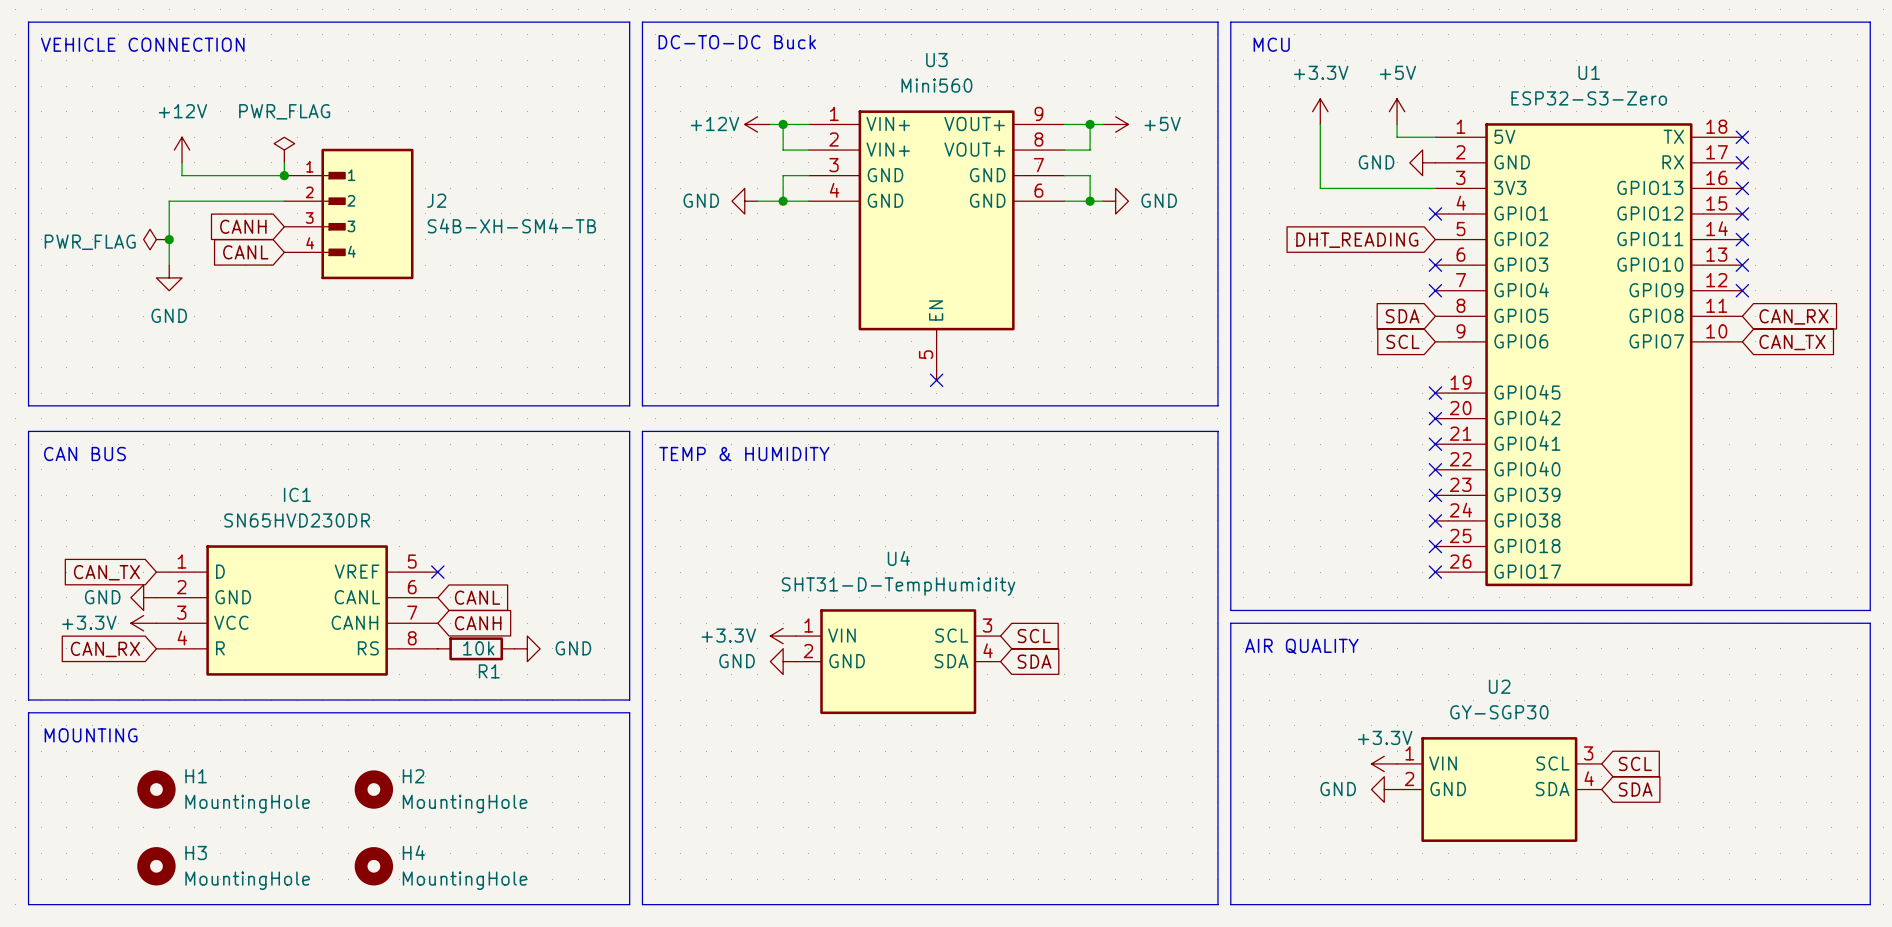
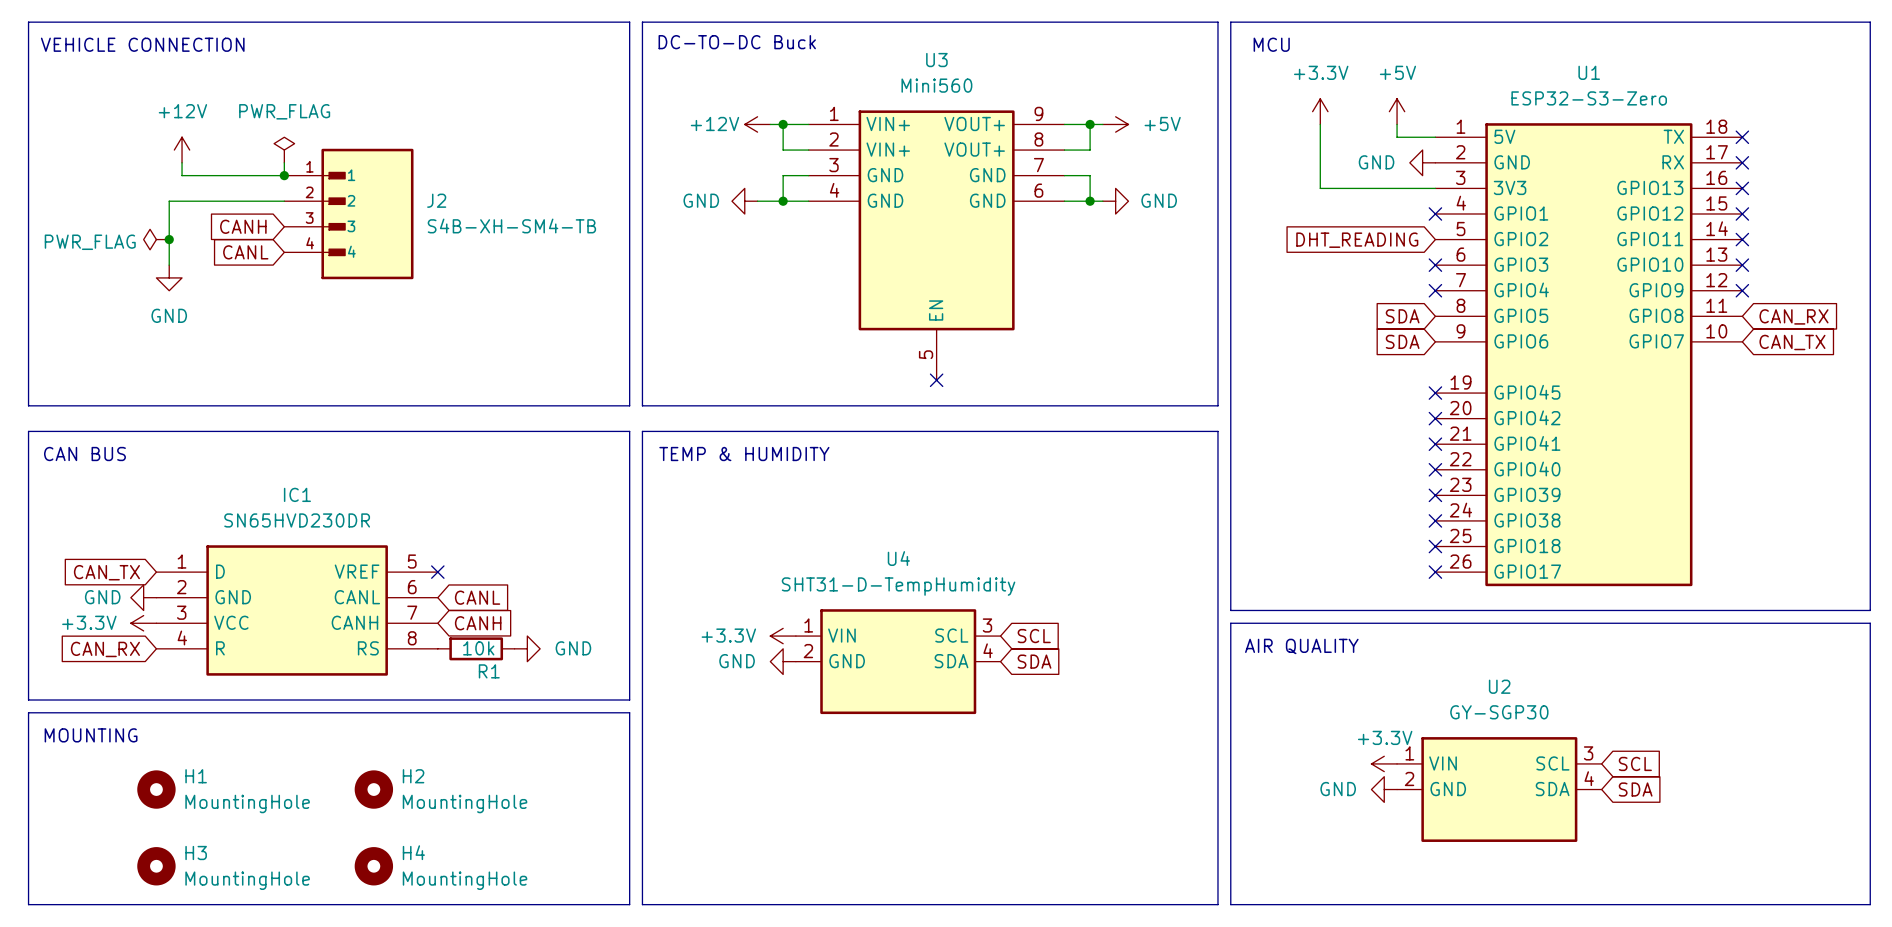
global label: SCL (1402, 341) -> SDA (1402, 341)

